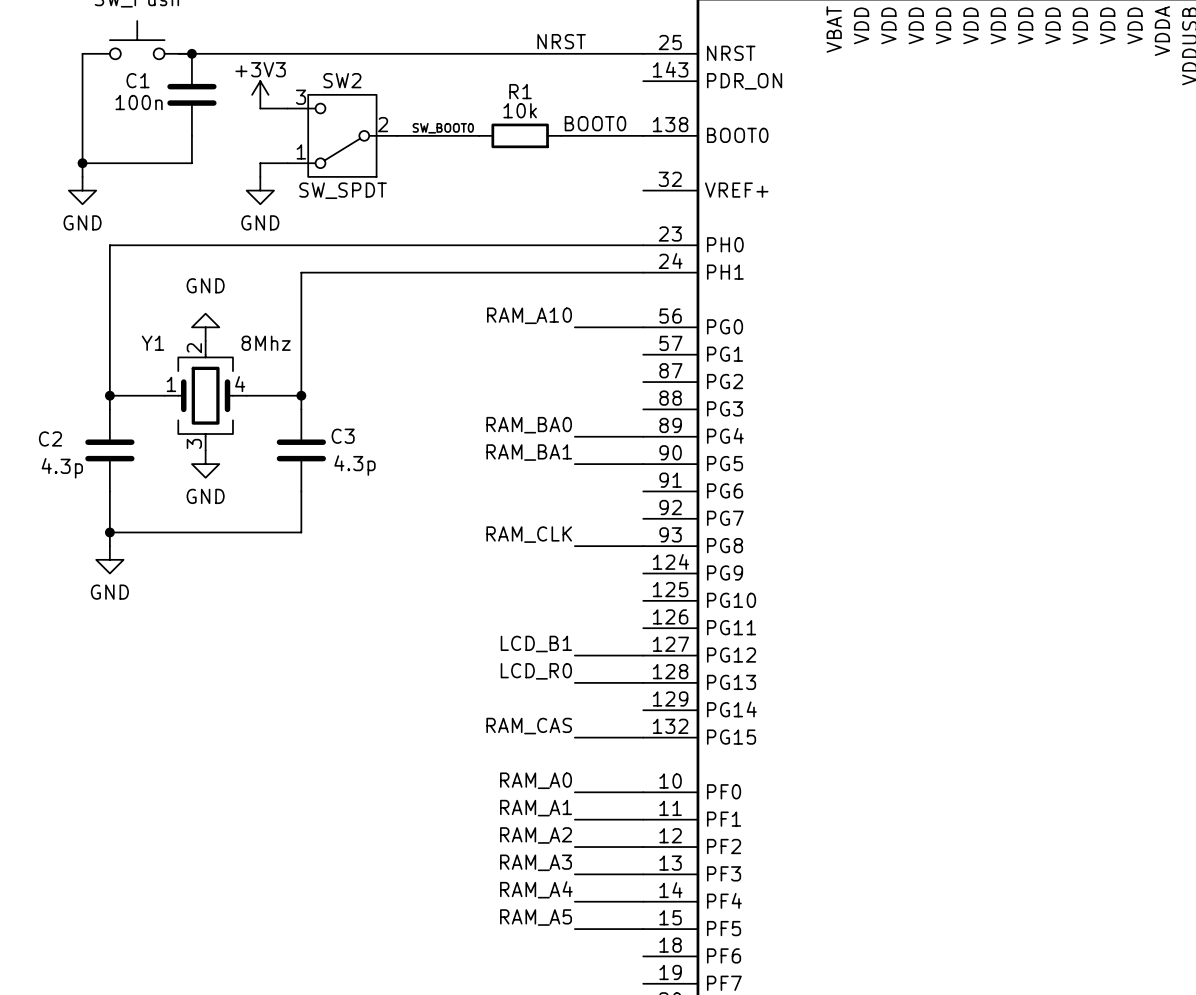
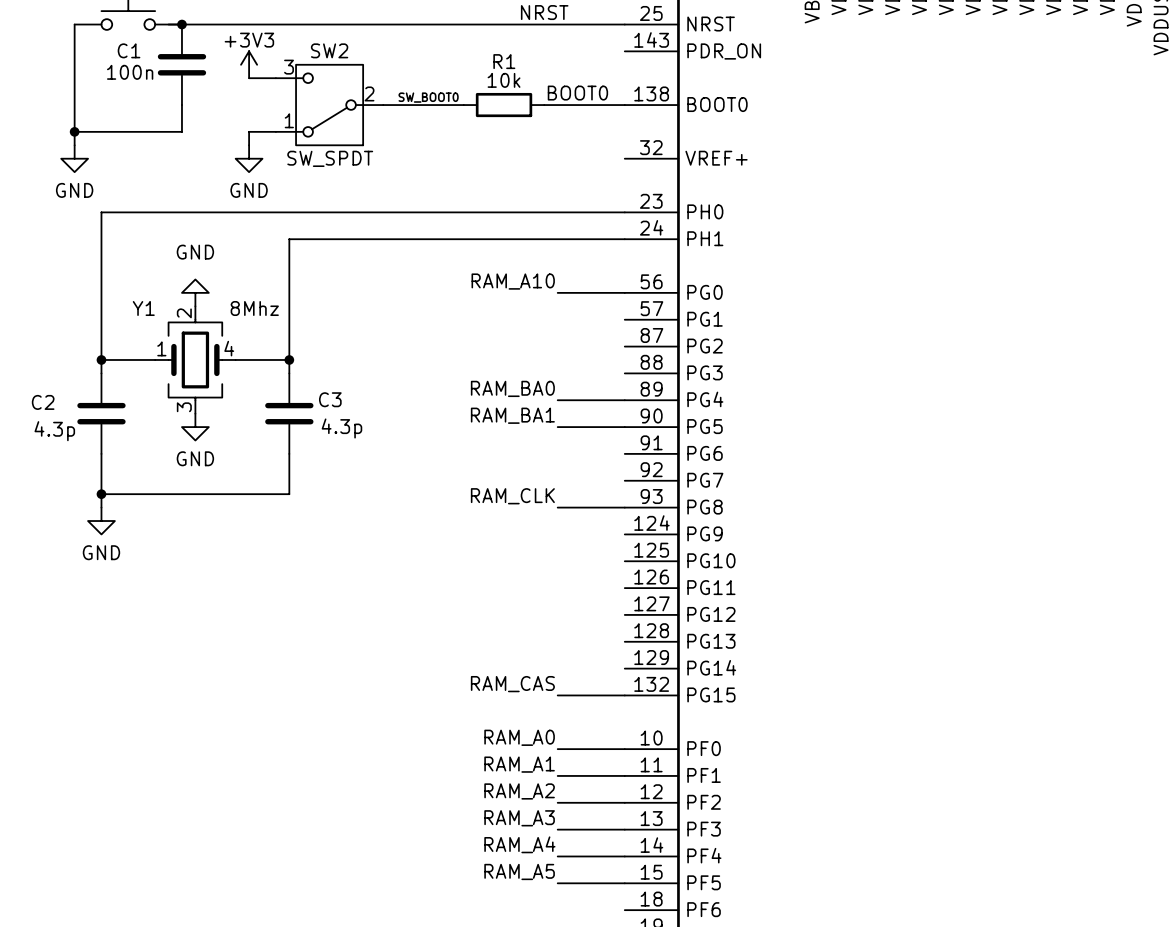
label: LCD_B1 (536, 644) -> none
wire: (574, 655) (643, 655) -> none
label: LCD_R0 (536, 671) -> none
wire: (574, 682) (643, 682) -> none

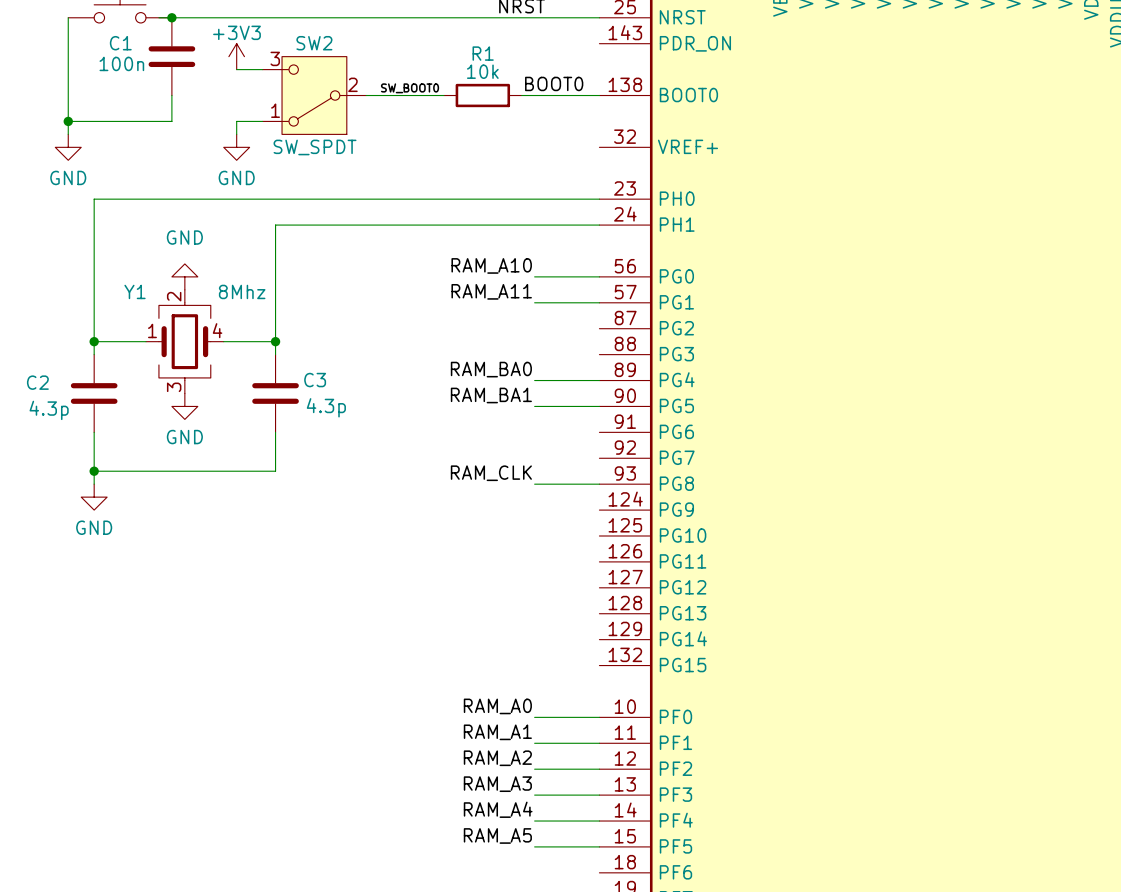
label: none -> RAM_A11 (491, 291)
wire: none -> (534, 302) (599, 302)
label: RAM_CAS (512, 684) -> none
wire: (557, 695) (624, 695) -> none

